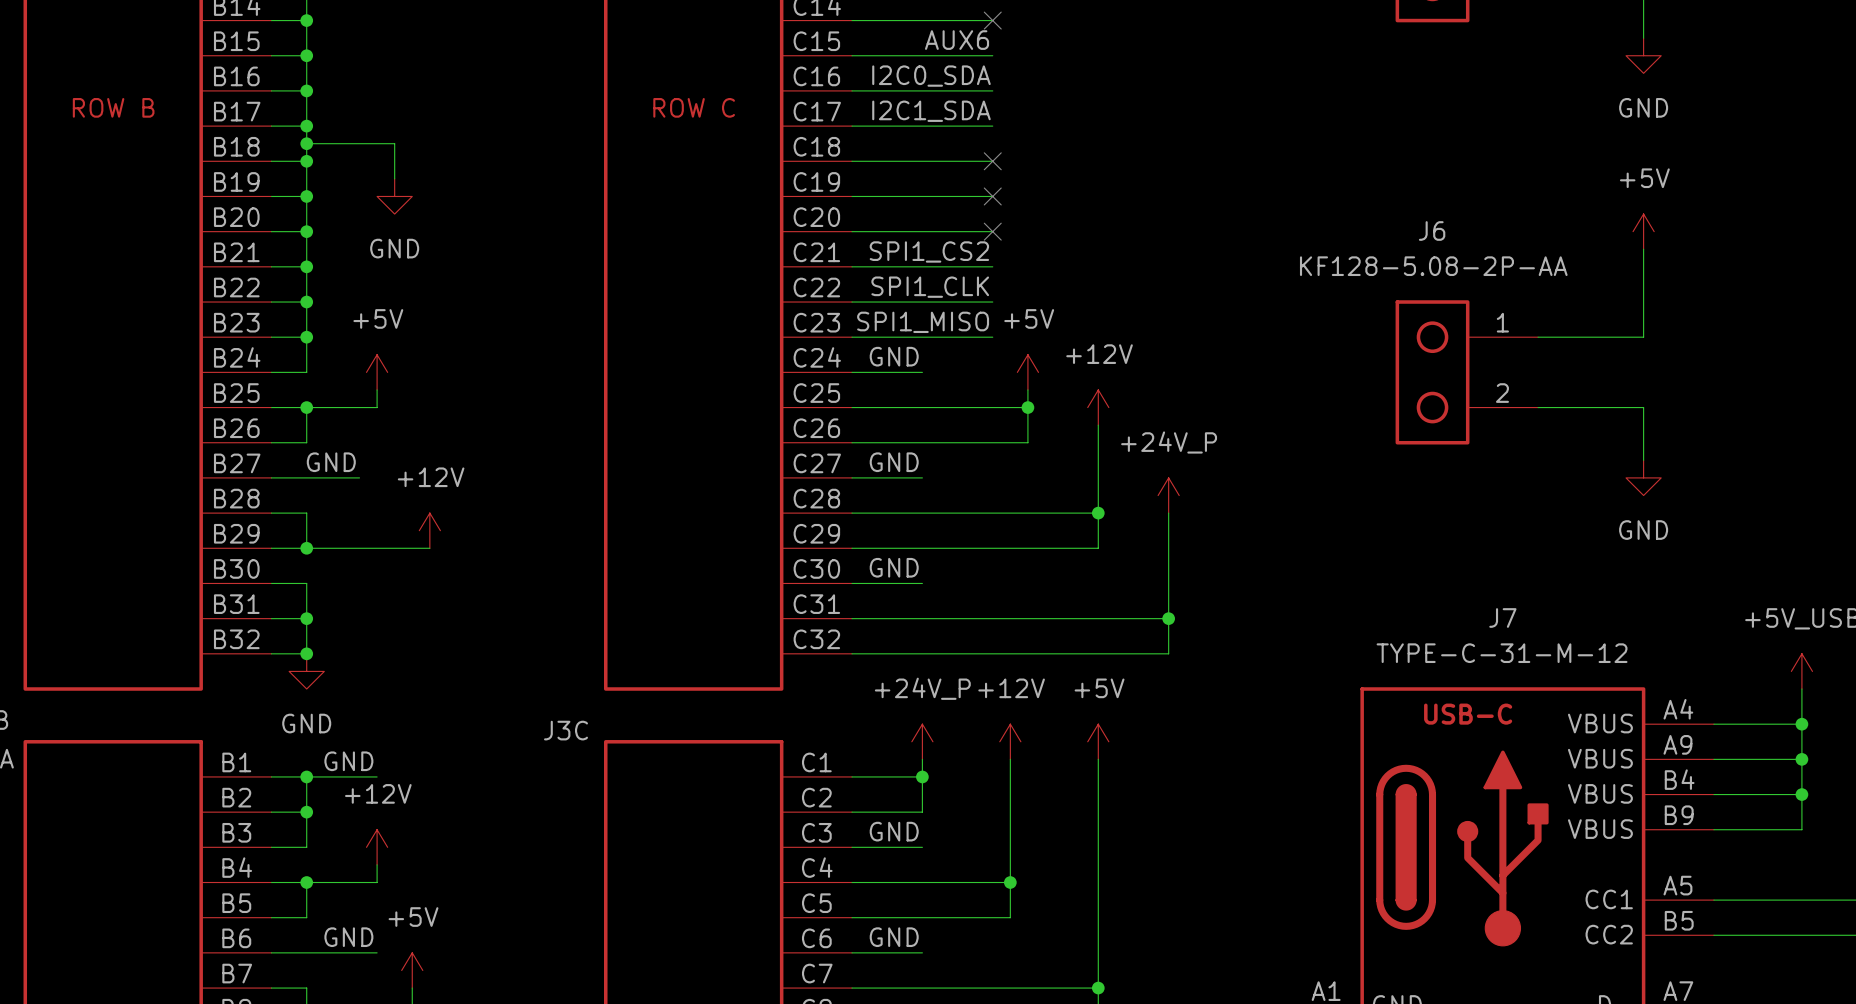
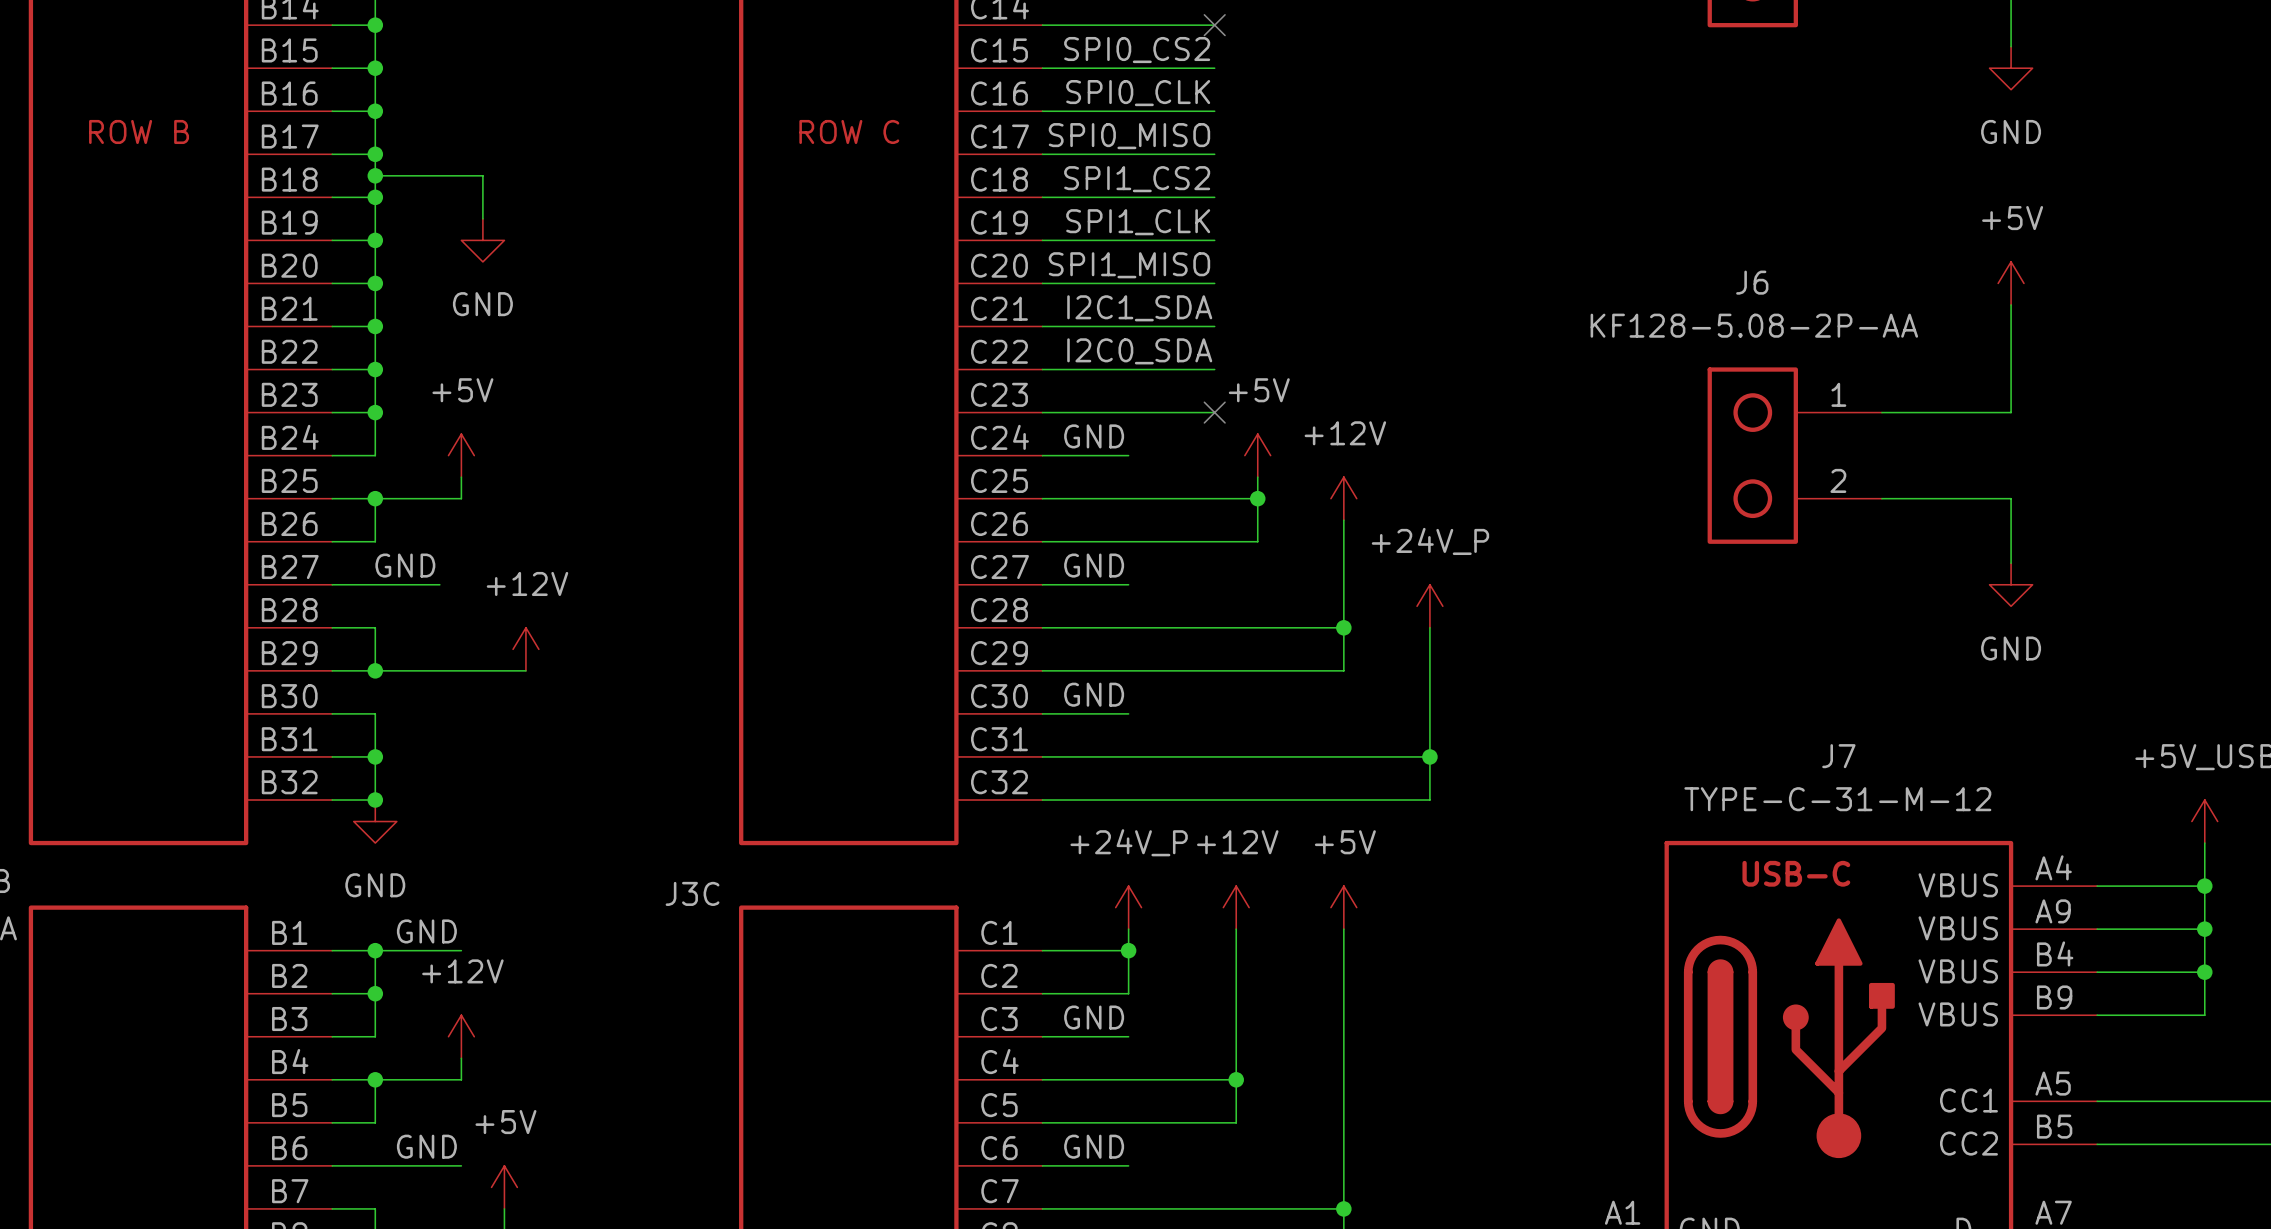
label: AUX6 (957, 40) -> SPI0_CS2 (1137, 50)
label: I2C0_SDA (931, 76) -> SPI0_CLK (1138, 93)
label: I2C1_SDA (931, 111) -> SPI0_MISO (1129, 136)
label: none -> SPI1_CS2 (1137, 179)
no-connect mark: (992, 161) -> none
label: none -> SPI1_CLK (1138, 222)
no-connect mark: (992, 196) -> none
no-connect mark: (992, 231) -> none
label: SPI1_CS2 (929, 251) -> I2C1_SDA (1139, 308)
label: SPI1_CLK (930, 287) -> I2C0_SDA (1139, 351)
label position: SPI1_MISO (923, 322) -> SPI1_MISO (1129, 265)
no-connect mark: none -> (1214, 412)

